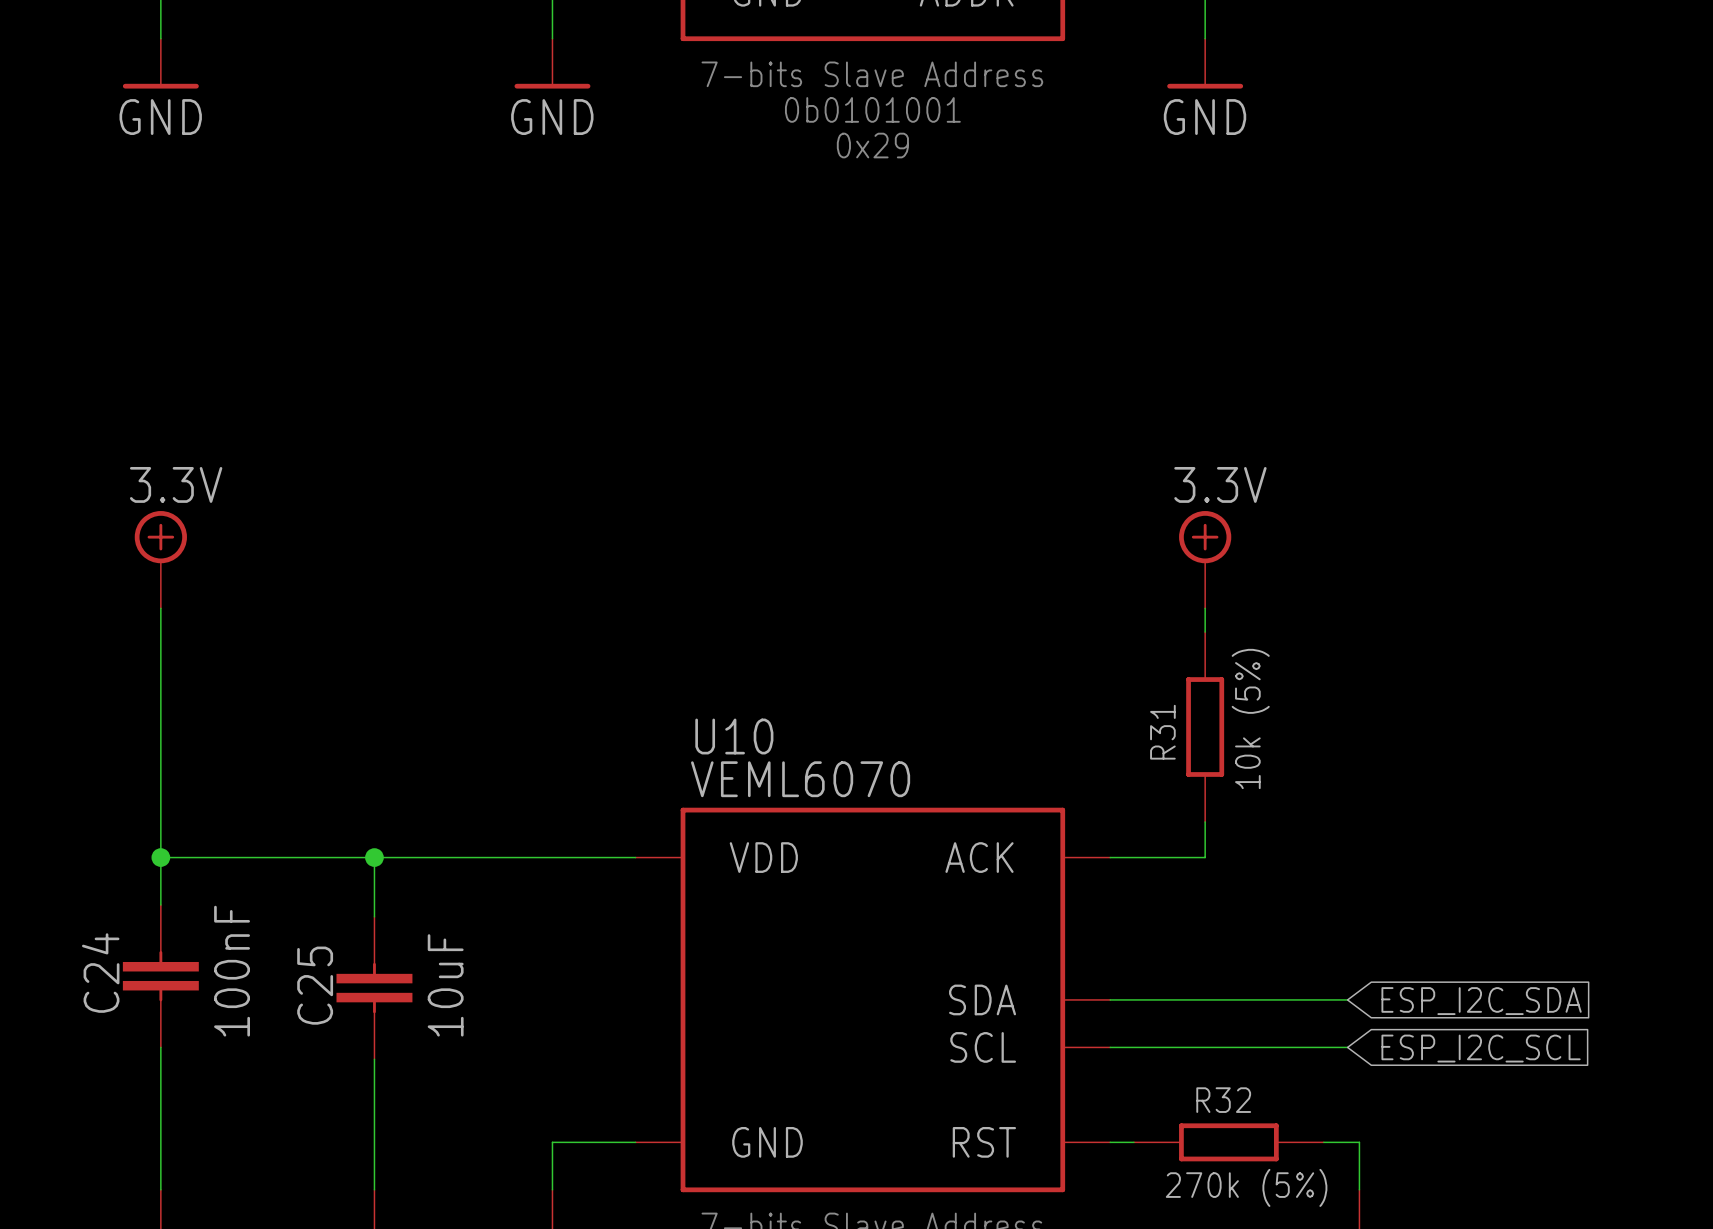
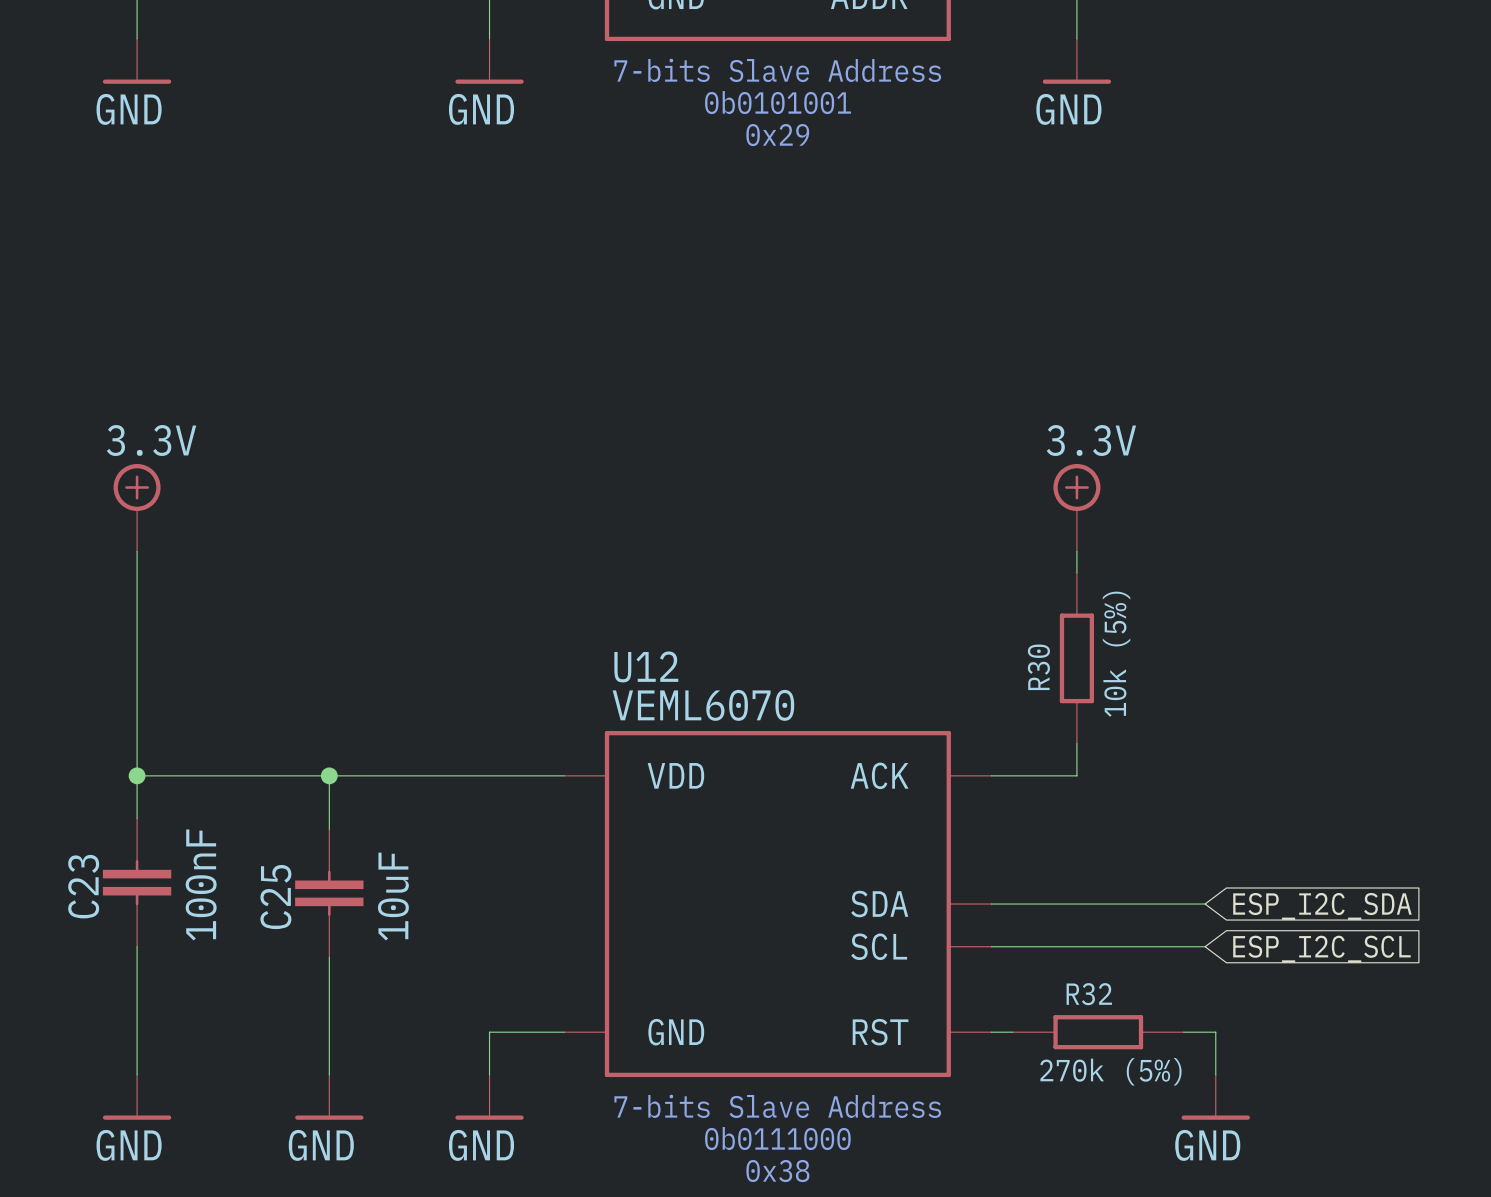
R31 name: R31 (1162, 732) -> R30 (1038, 667)
U10 name: U10 (734, 736) -> U12 (646, 666)
C24 name: C24 (100, 973) -> C23 (83, 886)

